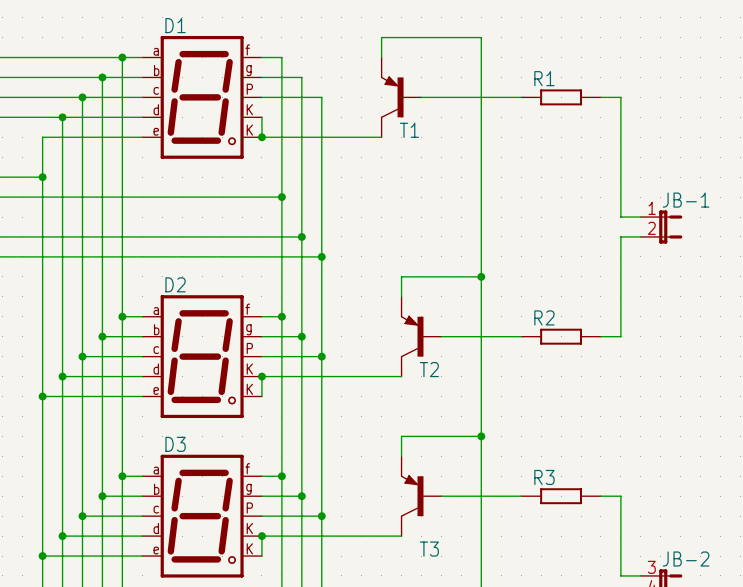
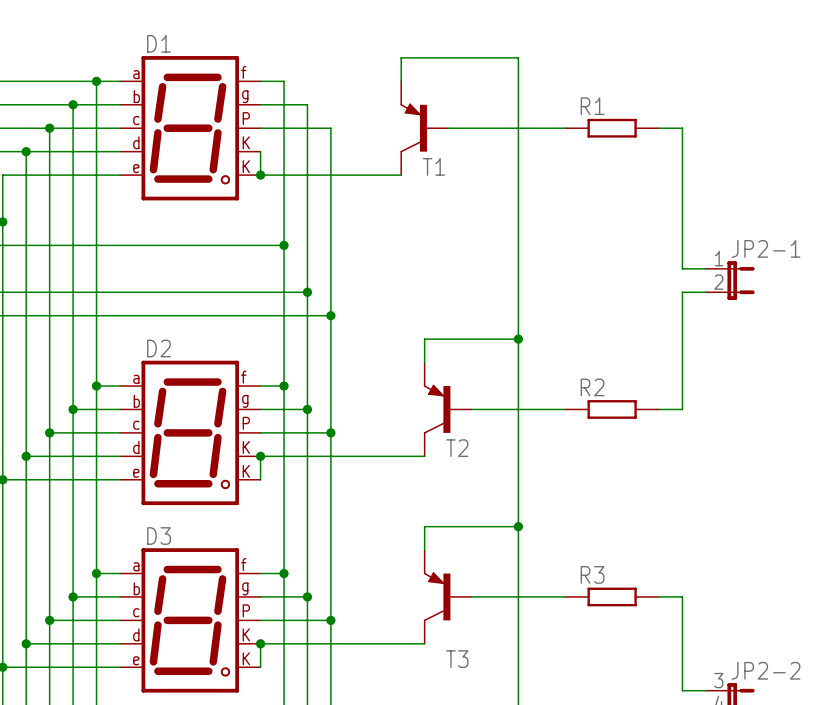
JB-1 name: JB-1 (686, 200) -> JP2-1 (766, 248)
JB-2 name: JB-2 (686, 559) -> JP2-2 (766, 670)

